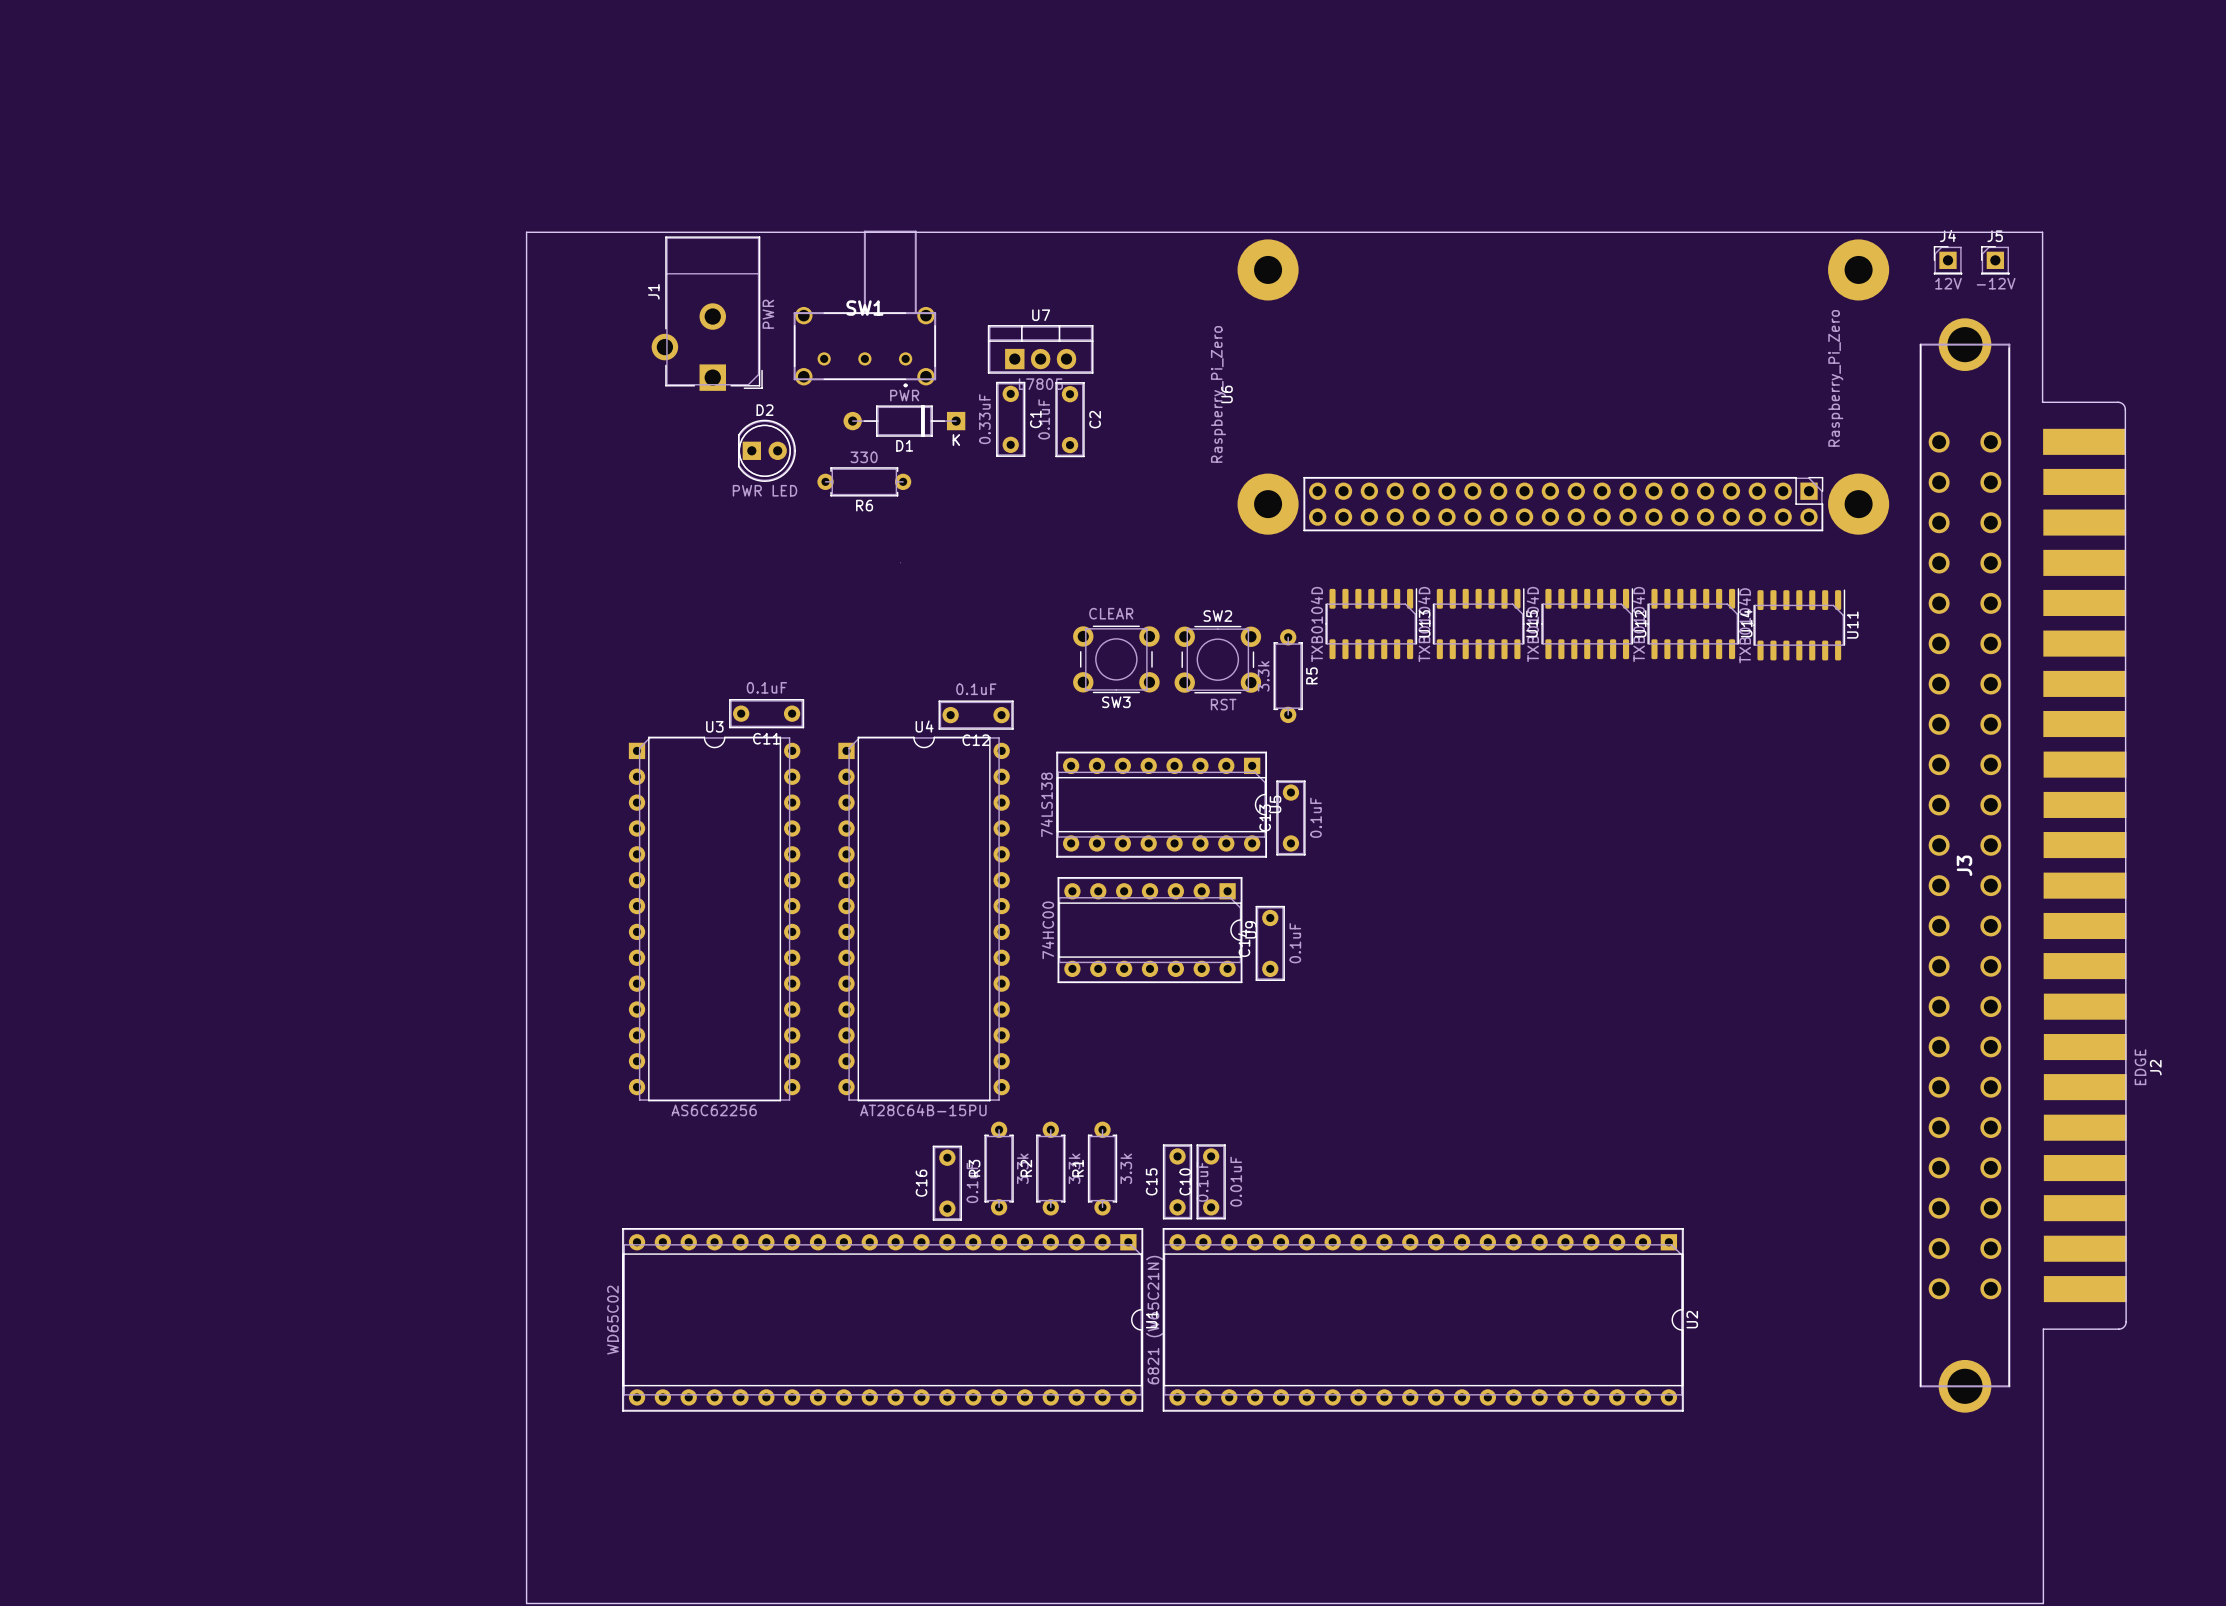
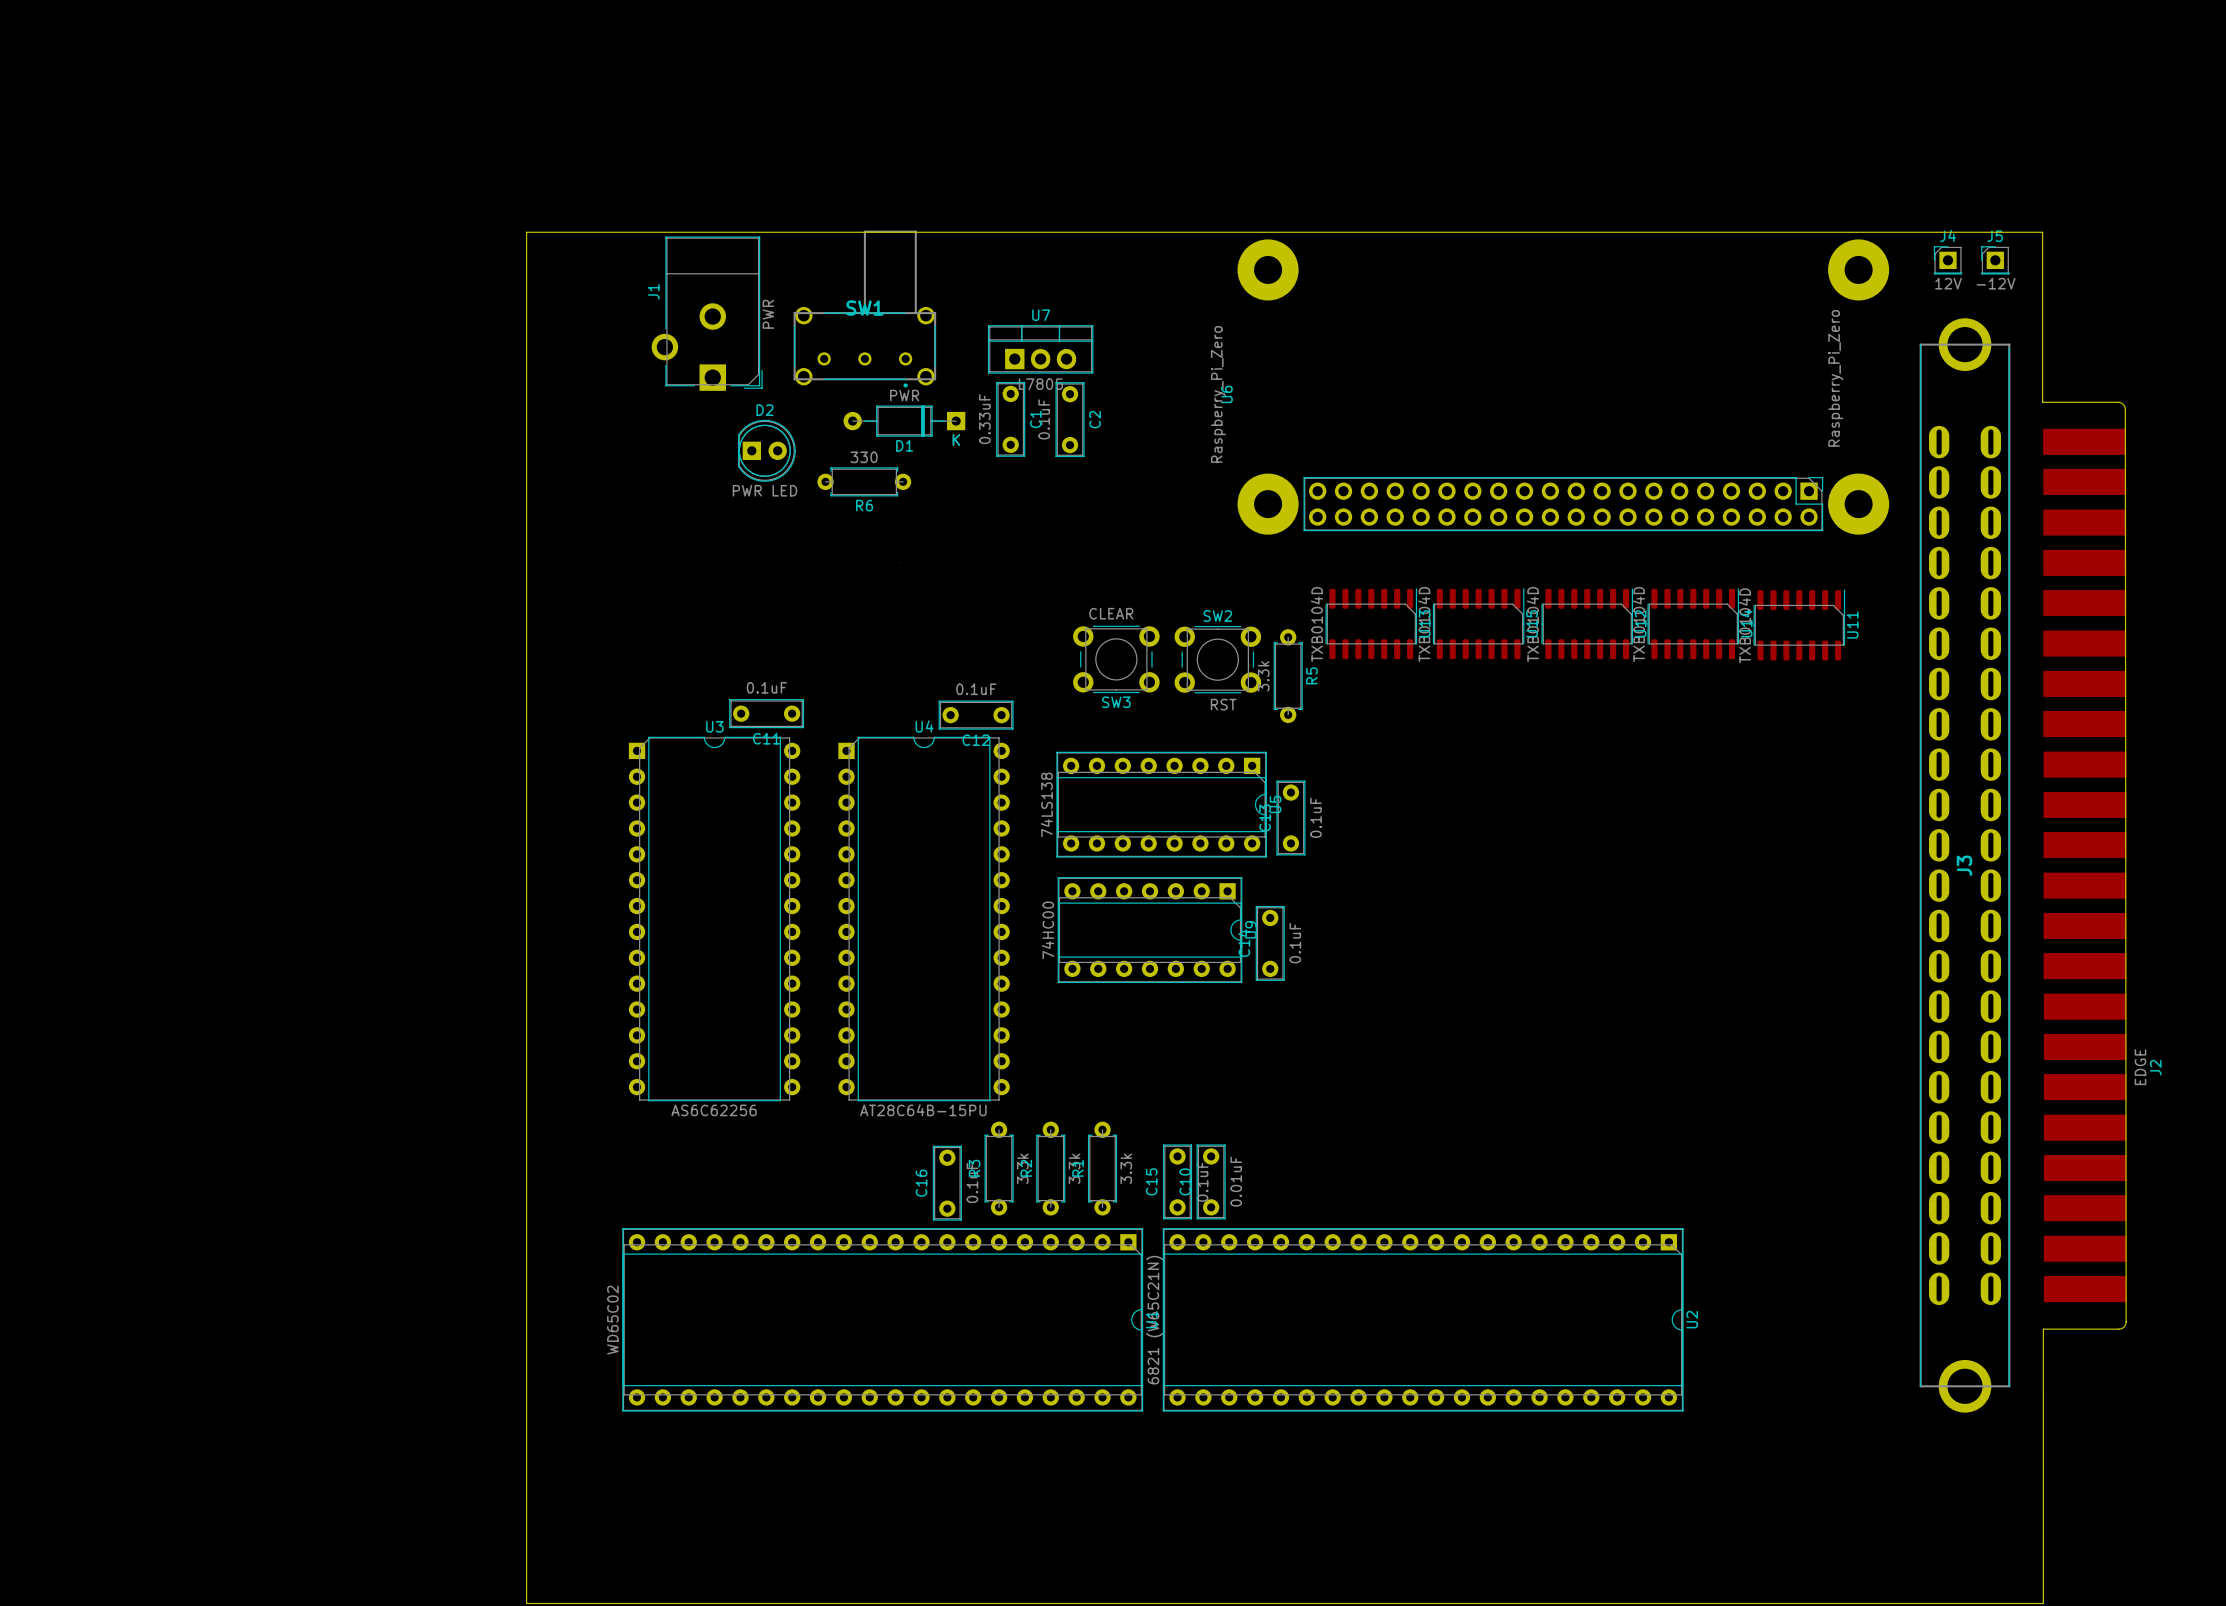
J3 footprint: [1919, 318, 2011, 1413] -> [1919, 318, 2011, 1413]

